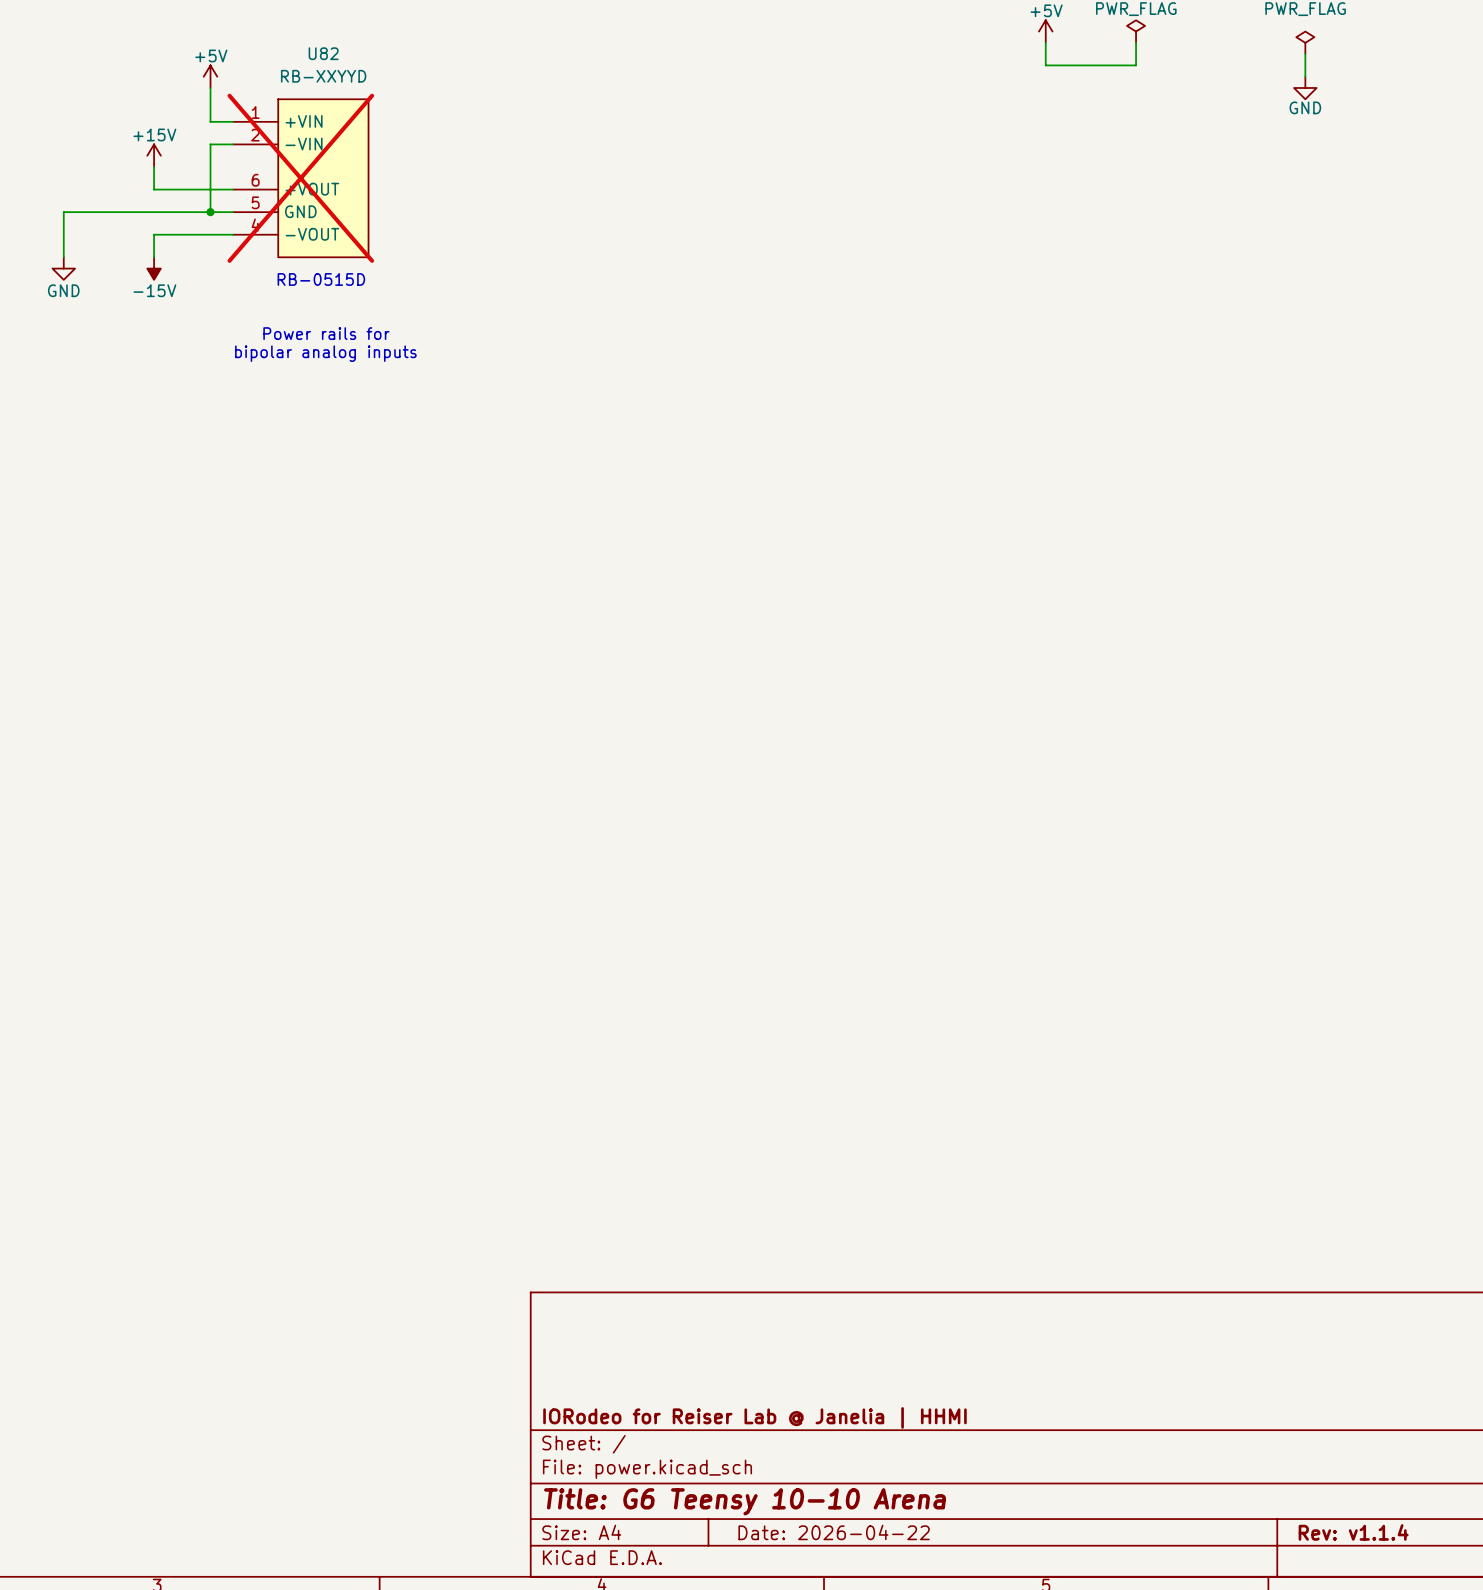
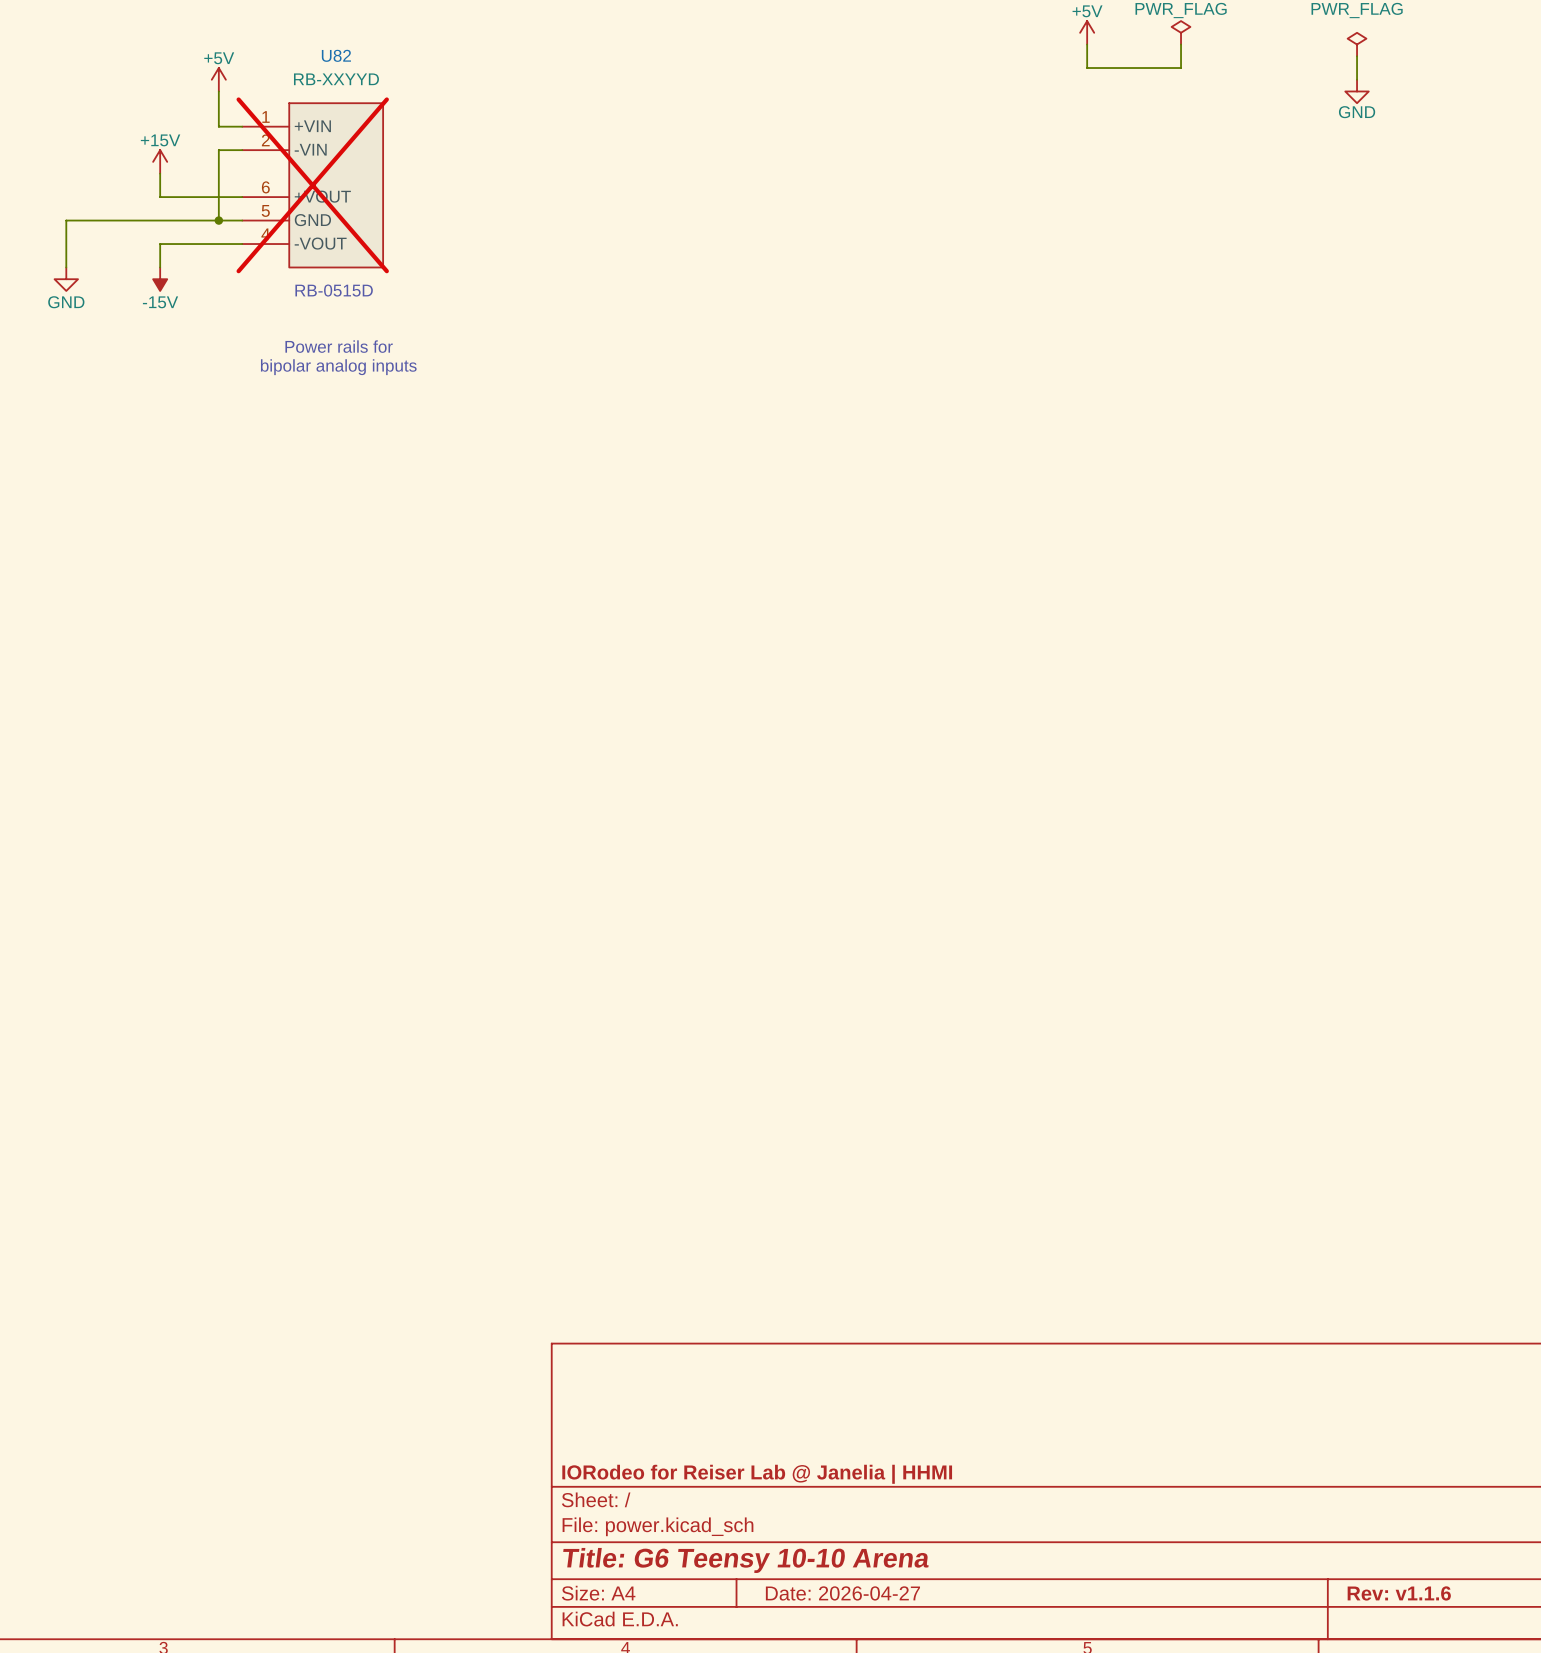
title block: Date: 2026-04-22 (834, 1532) -> Date: 2026-04-27 (842, 1593)
title block: Rev: v1.1.4 (1353, 1532) -> Rev: v1.1.6 (1399, 1593)

